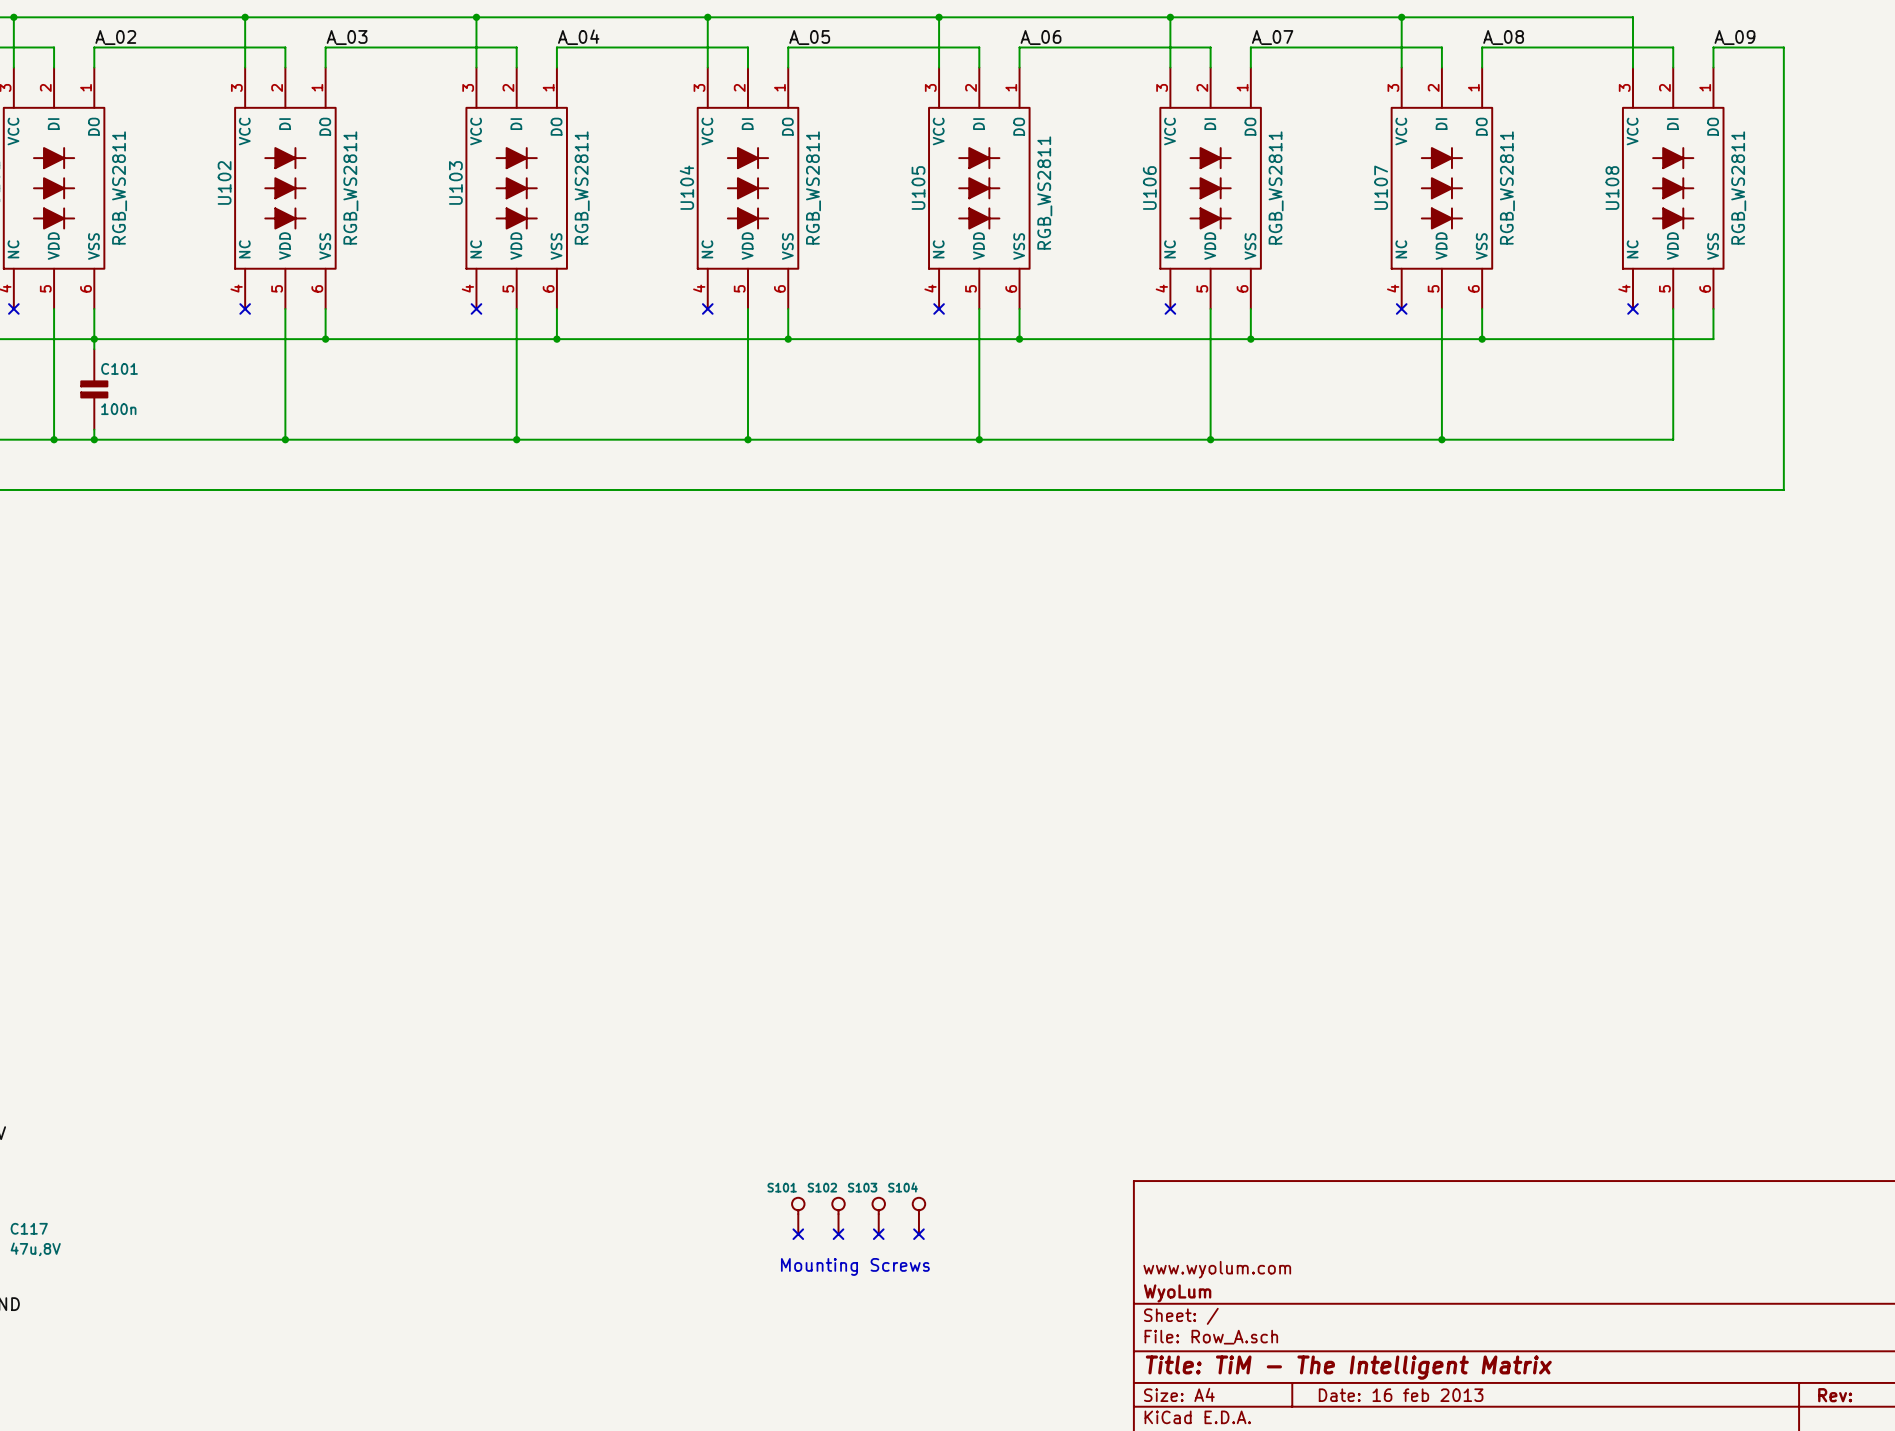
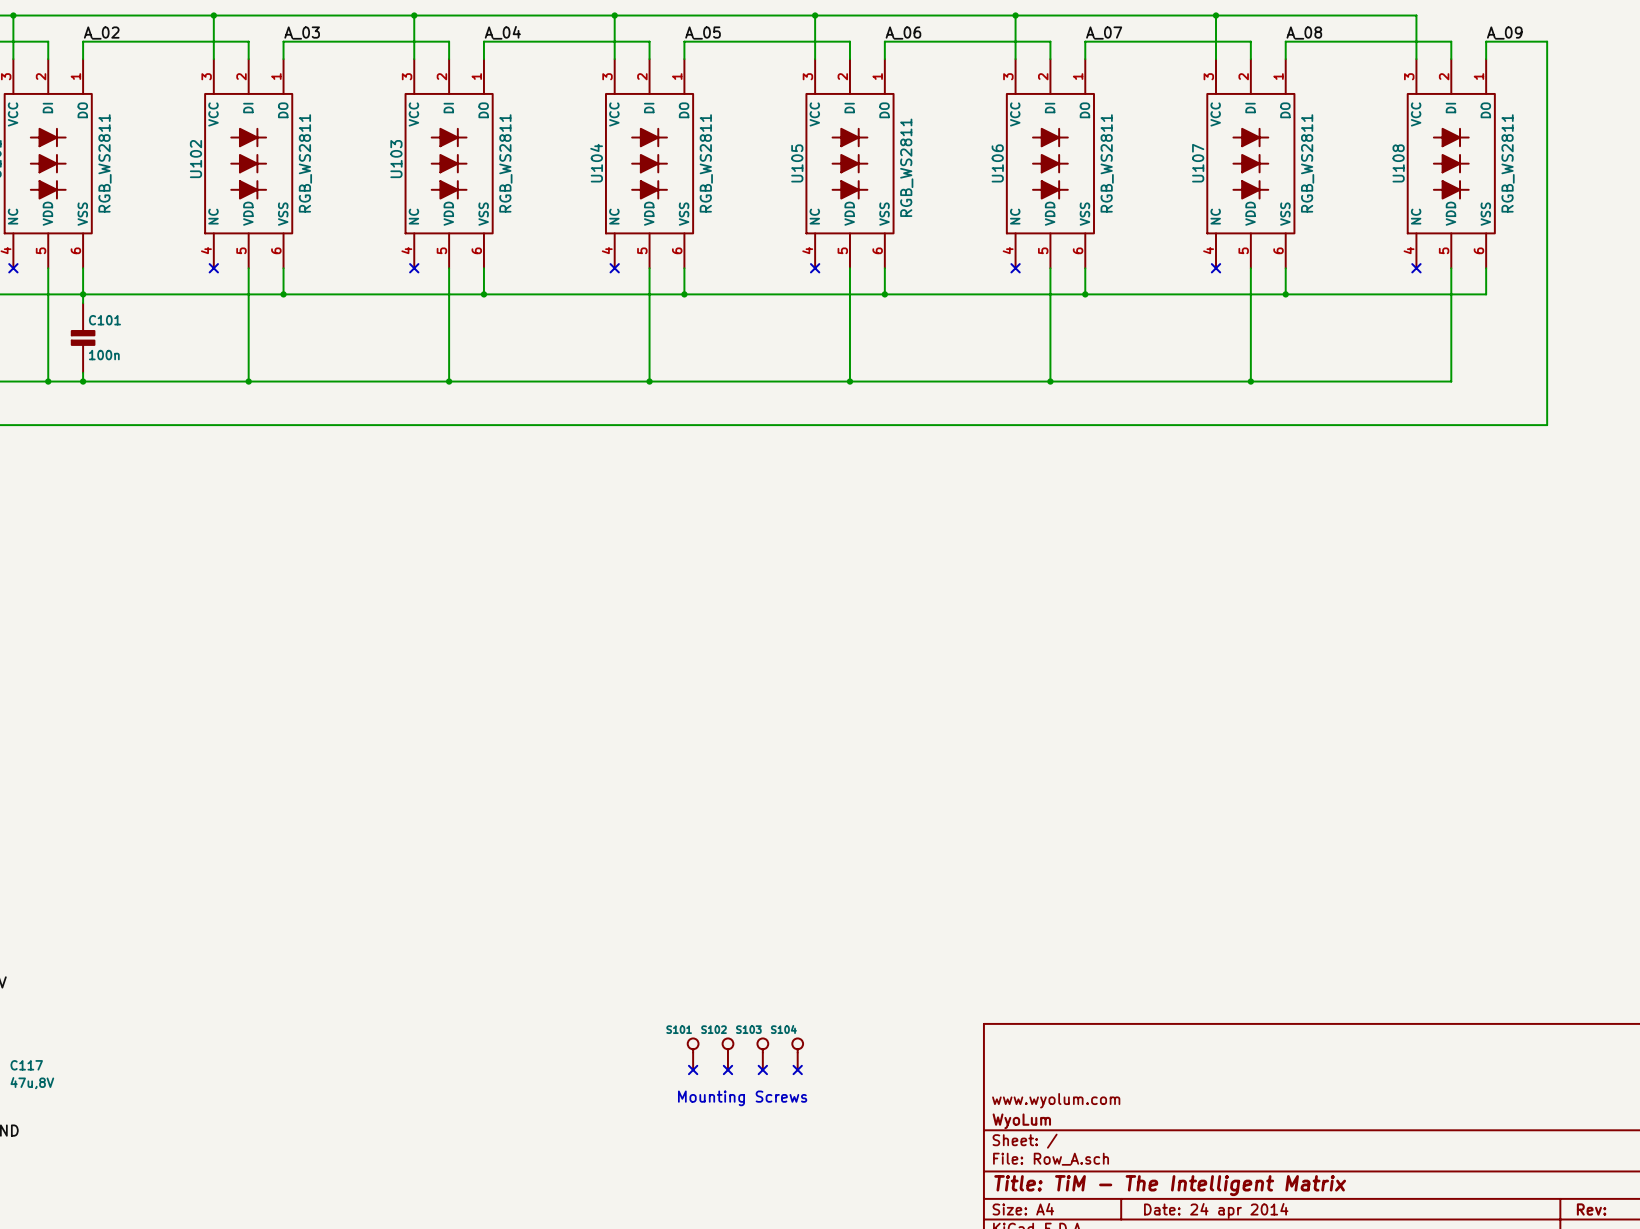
title block: Date: 16 feb 2013 (1401, 1395) -> Date: 24 apr 2014 (1216, 1210)

